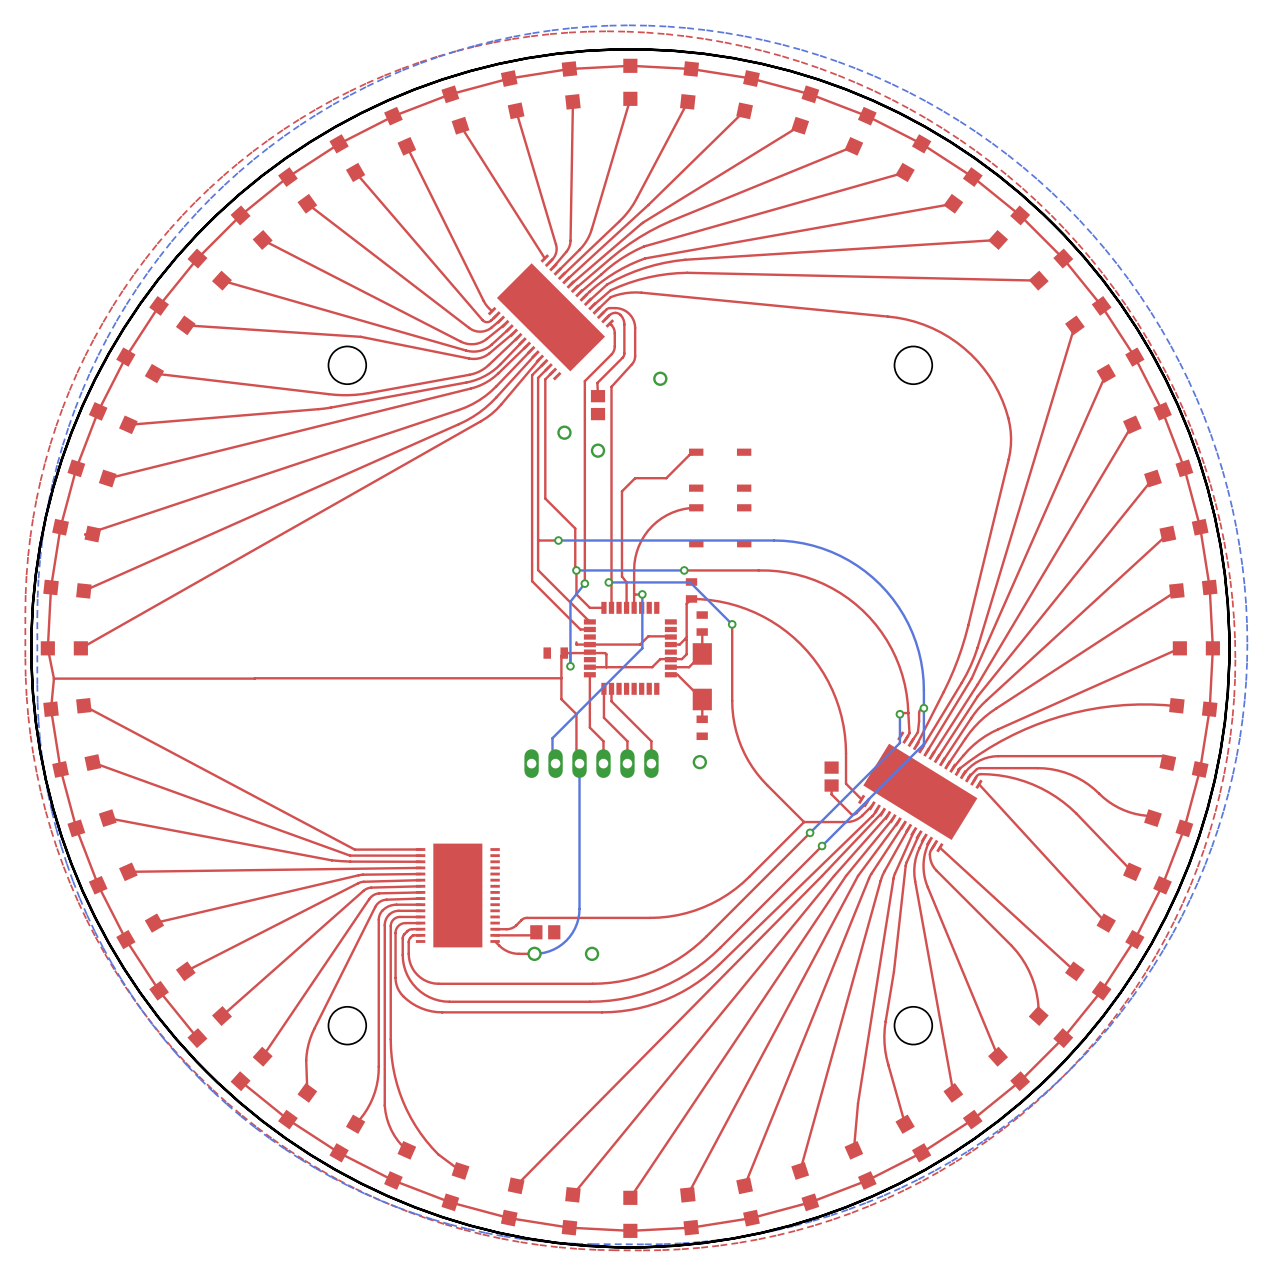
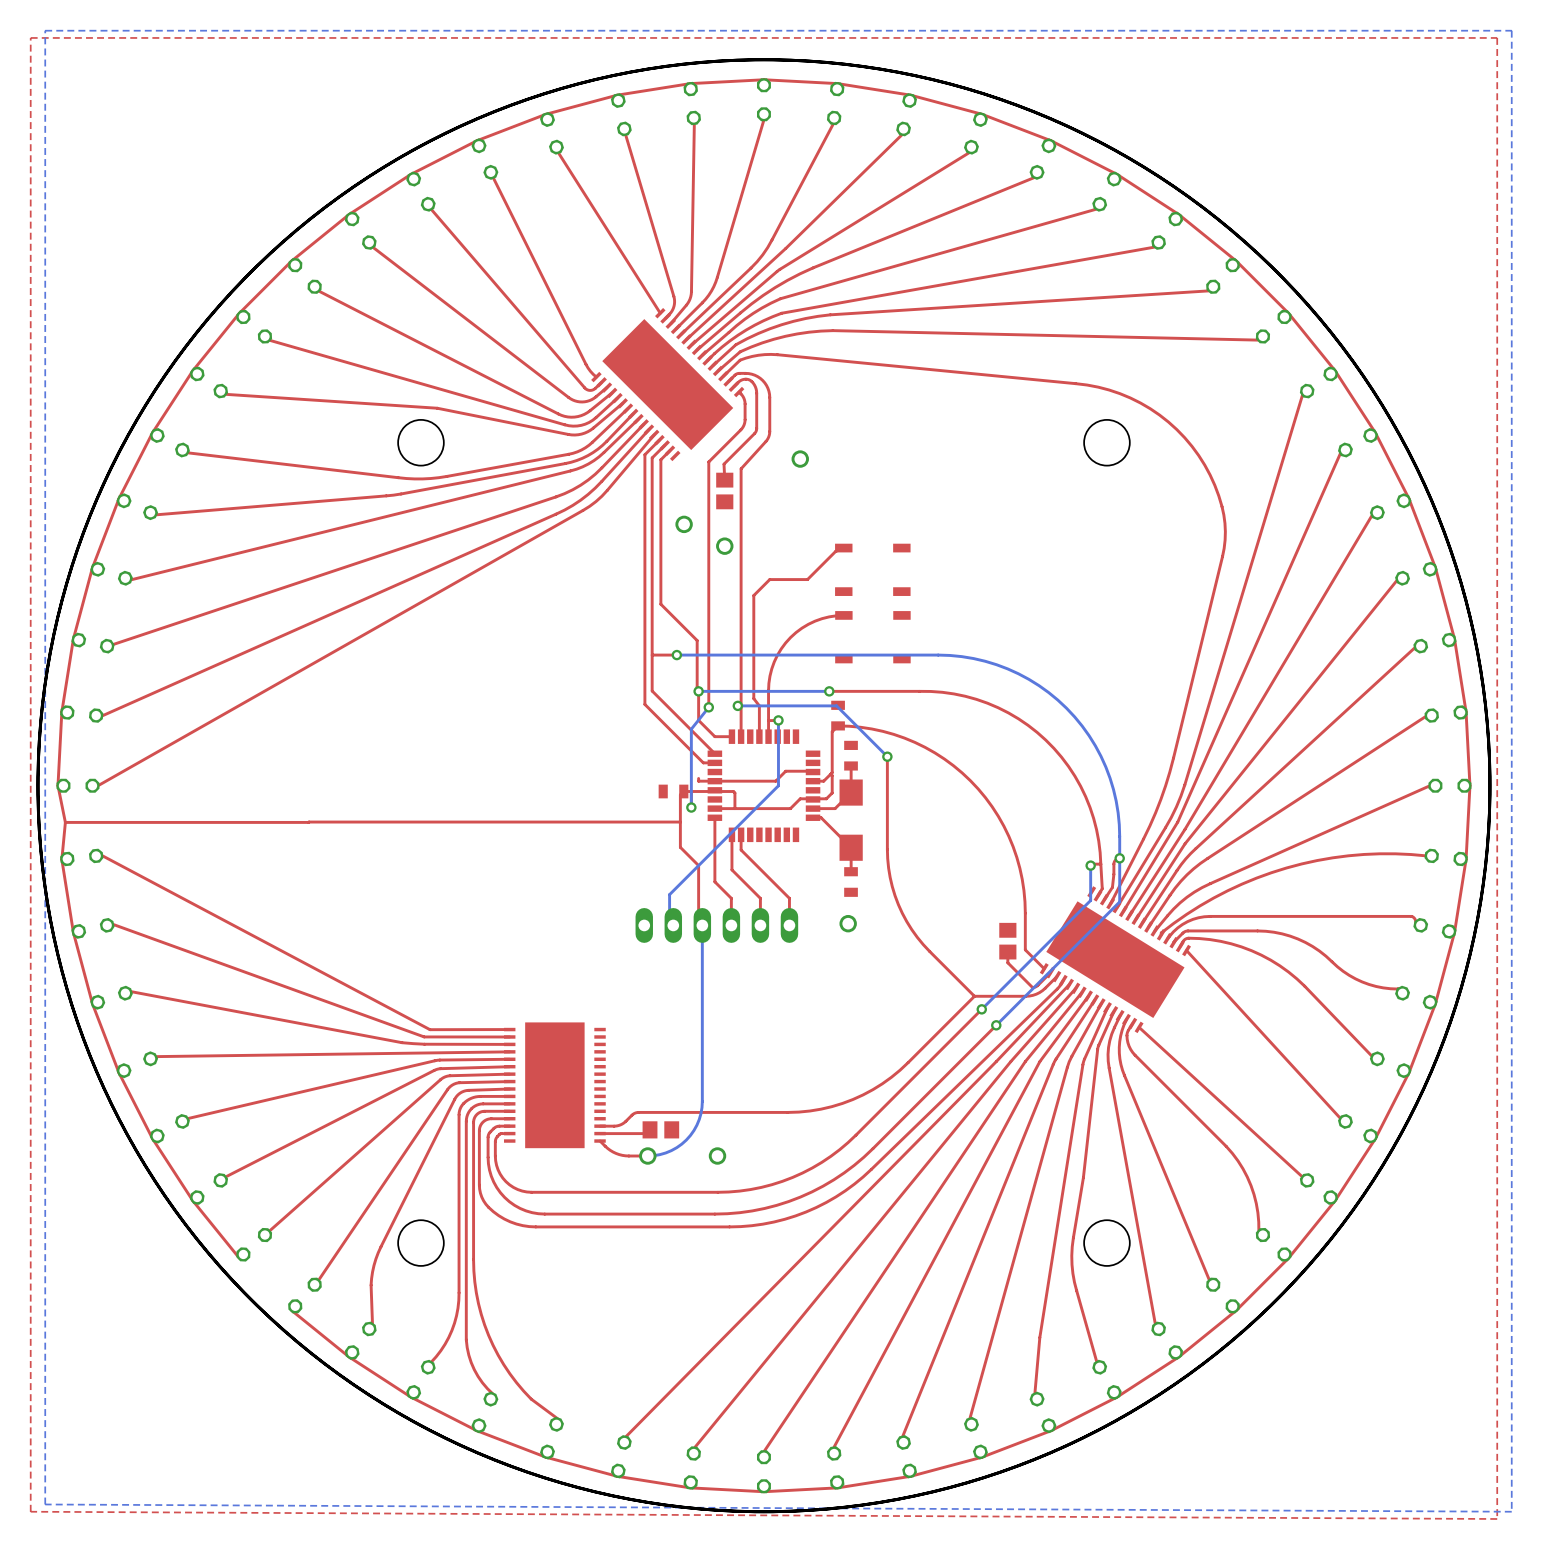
part footprint: [623, 58, 638, 106] -> [756, 78, 771, 122]
part footprint: [561, 61, 581, 110] -> [683, 81, 702, 126]
part footprint: [680, 61, 700, 110] -> [826, 81, 845, 126]
part footprint: [500, 70, 525, 120] -> [610, 93, 632, 137]
part footprint: [736, 70, 760, 120] -> [896, 93, 918, 137]
part footprint: [441, 85, 470, 135] -> [539, 112, 564, 155]
part footprint: [791, 85, 820, 135] -> [963, 112, 988, 155]
part footprint: [384, 106, 417, 156] -> [471, 138, 499, 180]
part footprint: [844, 106, 877, 156] -> [1029, 138, 1057, 180]
part footprint: [329, 134, 366, 183] -> [406, 171, 436, 212]
part footprint: [895, 134, 932, 183] -> [1092, 171, 1122, 212]
part footprint: [278, 167, 318, 214] -> [344, 211, 377, 250]
part footprint: [943, 167, 983, 214] -> [1151, 211, 1184, 250]
part footprint: [230, 205, 273, 250] -> [288, 258, 322, 294]
part footprint: [988, 205, 1031, 250] -> [1206, 258, 1240, 294]
part footprint: [187, 248, 232, 291] -> [236, 309, 273, 344]
part footprint: [1028, 248, 1074, 291] -> [1255, 309, 1292, 344]
part footprint: [149, 296, 196, 336] -> [189, 366, 229, 399]
part footprint: [1065, 296, 1112, 336] -> [1299, 366, 1339, 399]
part footprint: [116, 347, 165, 384] -> [149, 428, 190, 458]
part footprint: [1096, 347, 1145, 384] -> [1337, 428, 1379, 458]
part footprint: [88, 402, 138, 435] -> [116, 493, 159, 521]
part footprint: [1123, 402, 1172, 435] -> [1369, 493, 1412, 521]
part footprint: [67, 459, 117, 488] -> [90, 561, 133, 586]
part footprint: [1144, 459, 1194, 488] -> [1395, 561, 1438, 586]
part footprint: [52, 518, 102, 543] -> [71, 632, 115, 654]
part footprint: [1159, 518, 1209, 543] -> [1413, 632, 1457, 654]
part footprint: [43, 579, 92, 599] -> [60, 705, 104, 723]
part footprint: [1169, 579, 1218, 599] -> [1424, 705, 1468, 723]
top zone outline: (25, 613) (28, 556) (33, 518) (45, 462) (56, 426) (77, 372) (94, 338) (134, 274) (157, 244) (195, 201) (252, 151) (299, 119) (332, 100) (402, 68) (438, 56) (493, 42) (531, 36) (588, 31) (646, 32) (685, 36) (763, 51) (819, 68) (856, 83) (926, 118) (992, 163) (1037, 201) (1065, 229) (1115, 290) (1147, 339) (1166, 374) (1198, 446) (1215, 503) (1224, 541) (1230, 580) (1235, 639) (1232, 717) (1219, 794) (1209, 831) (1190, 886) (1155, 955) (1135, 988) (1100, 1035) (1047, 1091) (1018, 1117) (971, 1151) (904, 1190) (850, 1213) (813, 1225) (776, 1235) (719, 1245) (641, 1250) -> (30, 742) (30, 37) (1497, 37) (1497, 1519) (777, 1515)
part footprint: [40, 641, 88, 656] -> [56, 778, 100, 793]
part footprint: [1172, 641, 1220, 656] -> [1428, 778, 1472, 793]
top zone outline: (25, 657) (28, 715) (36, 772) (50, 828) (70, 883) (94, 935) (124, 985) (159, 1032) (198, 1075) (240, 1114) (287, 1149) (337, 1179) (389, 1204) (444, 1224) (500, 1238) (557, 1247) (615, 1250) -> (30, 796) (30, 1511) (746, 1515)
part footprint: [43, 697, 92, 718] -> [60, 848, 104, 867]
part footprint: [1169, 697, 1218, 718] -> [1424, 848, 1468, 867]
part footprint: [52, 754, 102, 778] -> [71, 917, 115, 939]
part footprint: [1159, 754, 1209, 778] -> [1413, 917, 1457, 939]
part footprint: [67, 809, 117, 838] -> [90, 985, 133, 1010]
part footprint: [1144, 809, 1194, 838] -> [1395, 985, 1438, 1010]
part footprint: [88, 862, 138, 895] -> [116, 1051, 159, 1079]
part footprint: [1123, 862, 1172, 895] -> [1369, 1051, 1412, 1079]
part footprint: [116, 913, 165, 950] -> [149, 1113, 190, 1144]
part footprint: [1096, 913, 1145, 950] -> [1337, 1113, 1379, 1144]
part footprint: [149, 961, 196, 1001] -> [189, 1173, 229, 1205]
part footprint: [1065, 961, 1112, 1001] -> [1299, 1173, 1339, 1205]
part footprint: [187, 1006, 232, 1049] -> [236, 1227, 273, 1262]
part footprint: [1028, 1006, 1074, 1049] -> [1255, 1227, 1292, 1262]
part footprint: [230, 1046, 273, 1092] -> [288, 1277, 322, 1314]
part footprint: [988, 1046, 1031, 1092] -> [1206, 1277, 1240, 1314]
part footprint: [278, 1083, 318, 1130] -> [344, 1321, 377, 1360]
part footprint: [943, 1083, 983, 1130] -> [1151, 1321, 1184, 1360]
part footprint: [329, 1114, 366, 1163] -> [406, 1359, 436, 1400]
part footprint: [895, 1114, 932, 1163] -> [1092, 1359, 1122, 1400]
part footprint: [384, 1140, 417, 1190] -> [471, 1391, 499, 1434]
part footprint: [844, 1140, 877, 1190] -> [1029, 1391, 1057, 1434]
part footprint: [441, 1162, 470, 1212] -> [539, 1416, 564, 1460]
part footprint: [791, 1162, 820, 1212] -> [963, 1416, 988, 1460]
part footprint: [500, 1177, 525, 1227] -> [610, 1435, 632, 1479]
part footprint: [736, 1177, 760, 1227] -> [896, 1435, 918, 1479]
part footprint: [561, 1187, 581, 1236] -> [683, 1446, 702, 1490]
part footprint: [680, 1187, 700, 1236] -> [826, 1446, 845, 1490]
part footprint: [623, 1190, 638, 1238] -> [756, 1450, 771, 1494]
bottom zone outline: (594, 1244) (539, 1241) (485, 1232) (432, 1219) (364, 1193) (315, 1168) (269, 1138) (226, 1104) (175, 1052) (141, 1009) (103, 947) (79, 897) (61, 846) (48, 793) (40, 739) (37, 702) (37, 597) (42, 539) (52, 482) (68, 426) (90, 372) (116, 321) (148, 272) (184, 226) (224, 185) (268, 147) (316, 114) (367, 86) (420, 63) (475, 45) (532, 33) (570, 28) (628, 25) (687, 28) (744, 36) (820, 55) (874, 76) (926, 101) (976, 132) (1023, 167) (1066, 206) (1117, 264) (1151, 312) (1179, 363) (1203, 416) (1222, 471) (1236, 527) (1244, 585) (1247, 643) (1244, 700) (1236, 756) (1223, 811) (1204, 865) (1181, 917) (1142, 982) (1108, 1027) (1070, 1069) (1028, 1107) (982, 1141) (934, 1171) (883, 1195) (830, 1215) (756, 1234) (700, 1241) (643, 1244) -> (720, 1507) (45, 1504) (45, 30) (1511, 30) (1511, 1511) (780, 1508)

